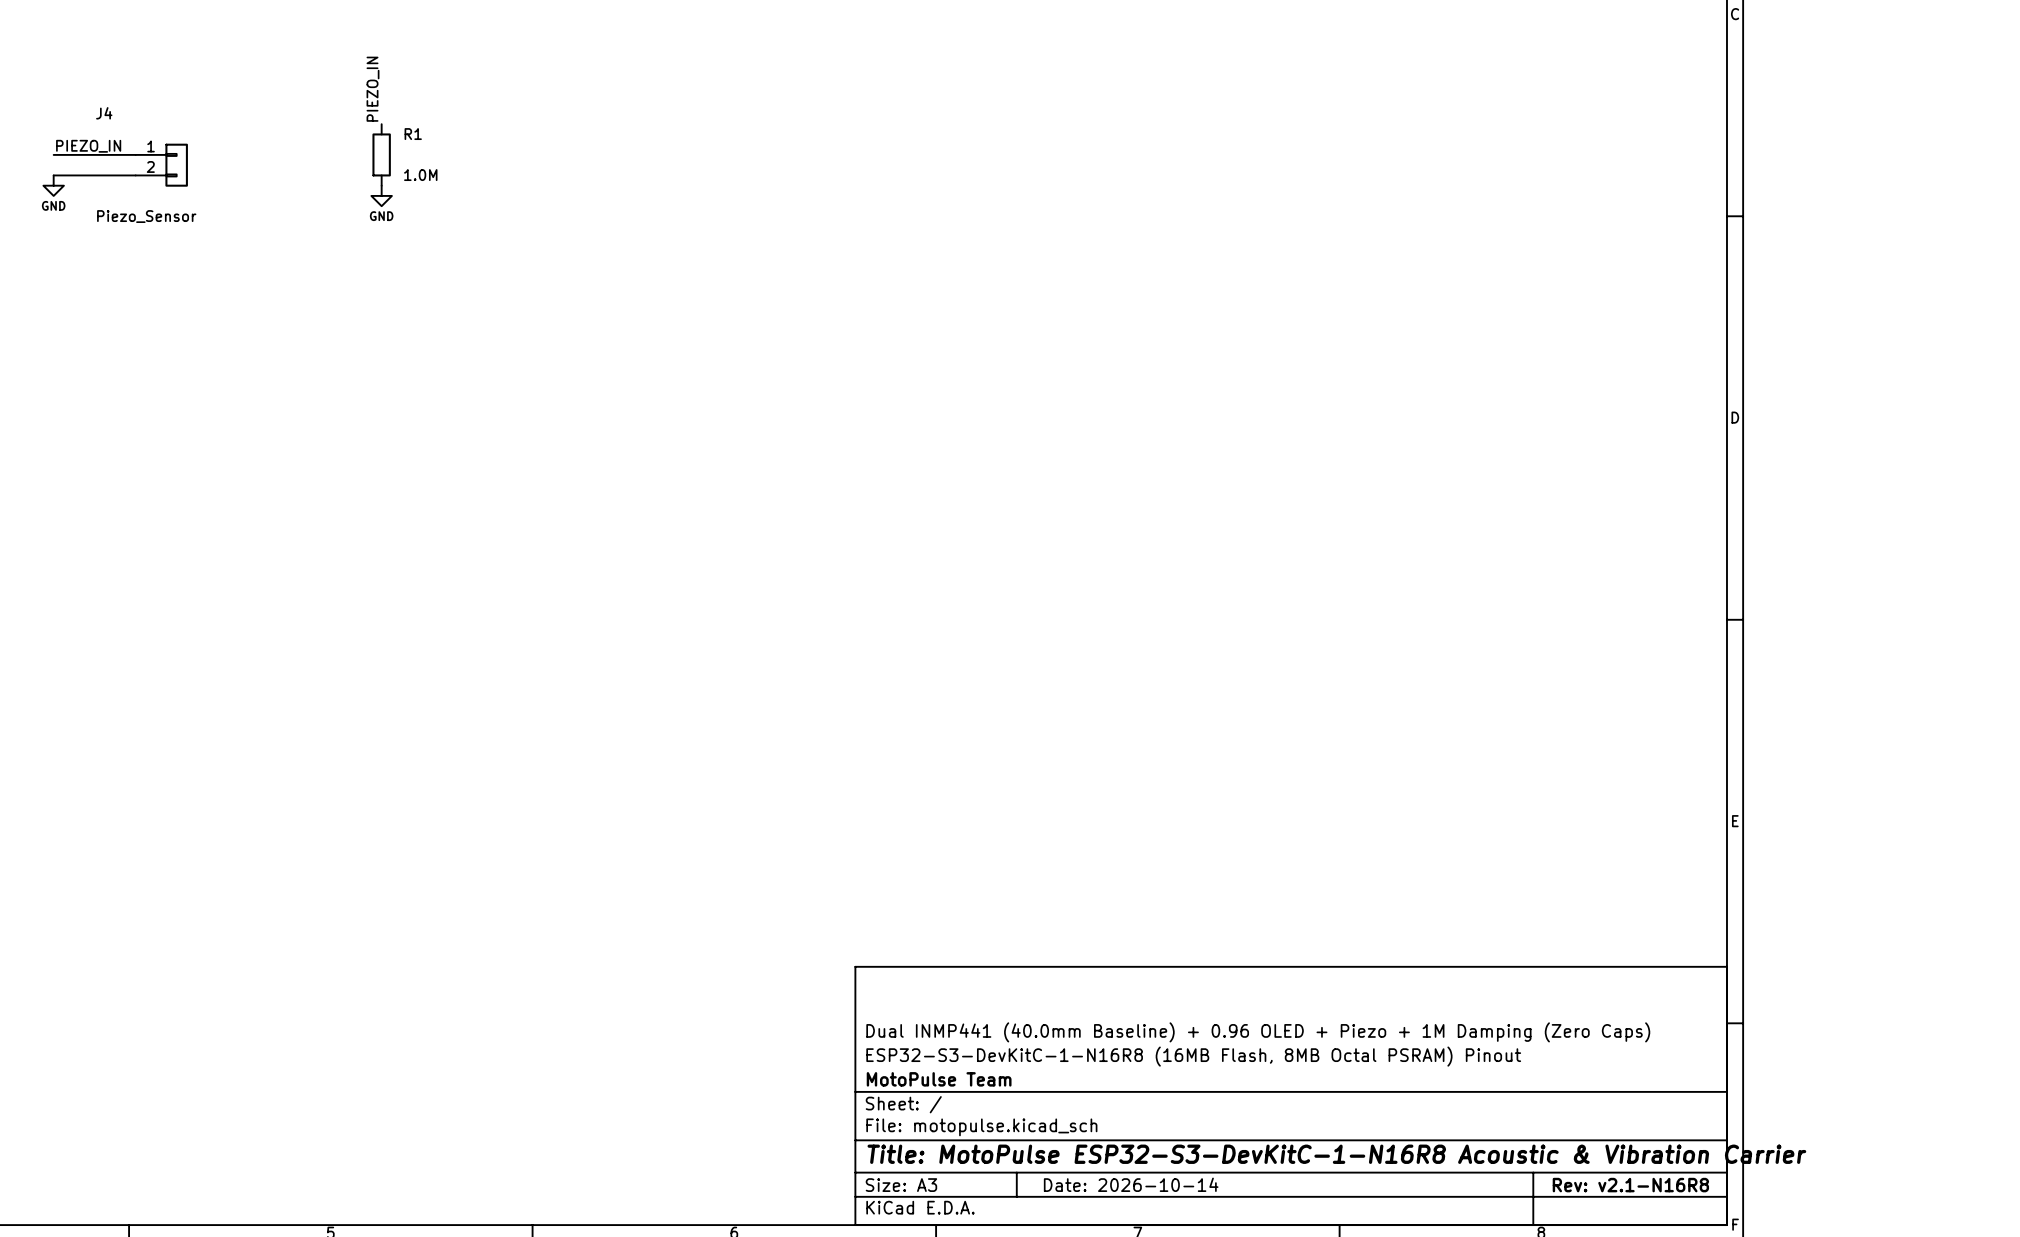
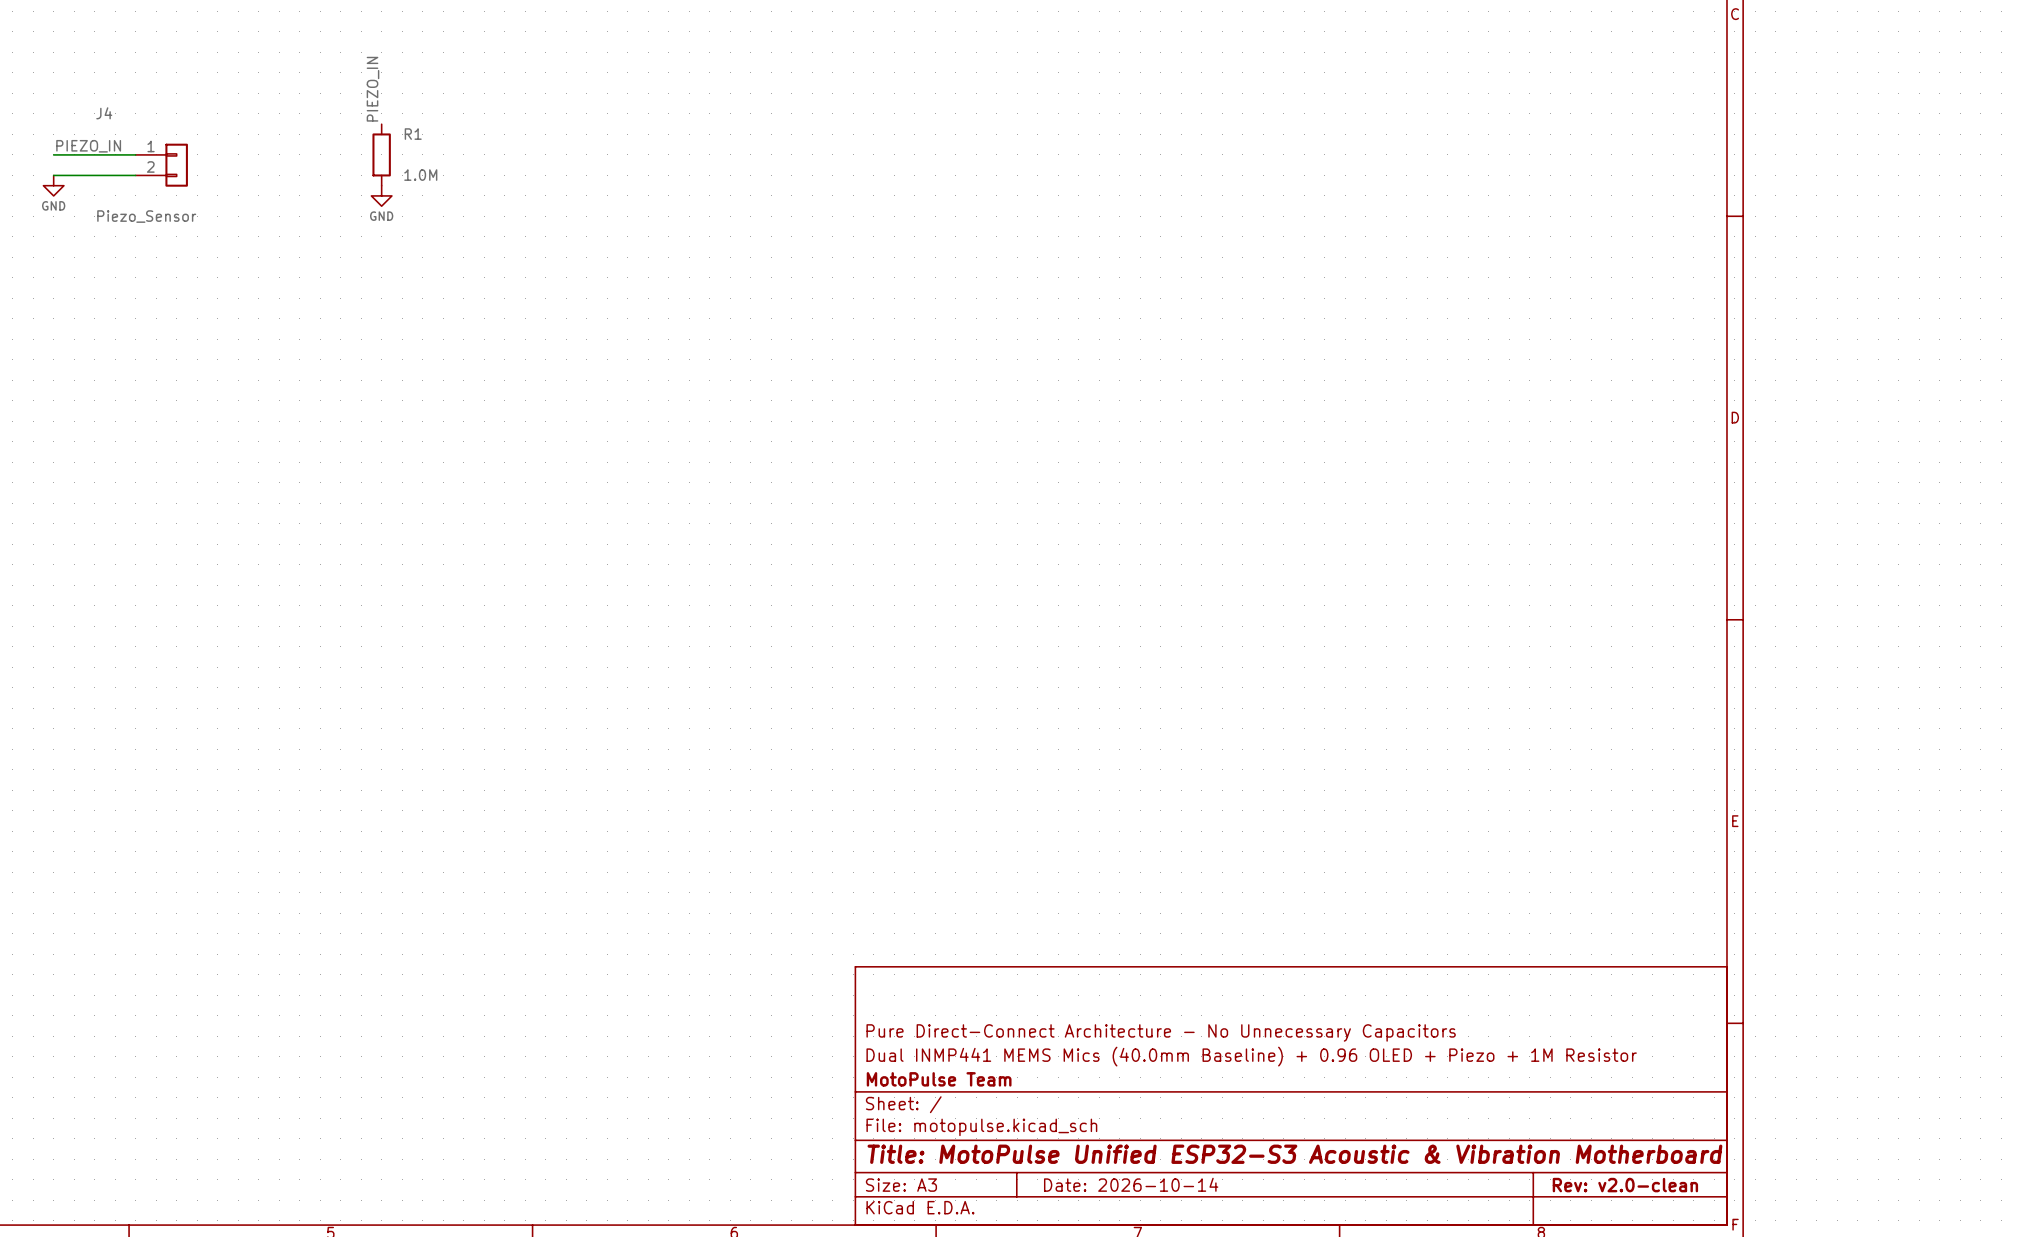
title block: Dual INMP441 (40.0mm Baseline) + 0.96 OLED + Piezo + 1M Damping (Zero Caps) (1258, 1032) -> Pure Direct-Connect Architecture - No Unnecessary Capacitors (1161, 1032)
title block: ESP32-S3-DevKitC-1-N16R8 (16MB Flash, 8MB Octal PSRAM) Pinout (1193, 1056) -> Dual INMP441 MEMS Mics (40.0mm Baseline) + 0.96 OLED + Piezo + 1M Resistor (1251, 1056)
title block: Title: MotoPulse ESP32-S3-DevKitC-1-N16R8 Acoustic & Vibration Carrier (1336, 1154) -> Title: MotoPulse Unified ESP32-S3 Acoustic & Vibration Motherboard (1294, 1154)
title block: Rev: v2.1-N16R8 (1630, 1185) -> Rev: v2.0-clean (1625, 1185)

